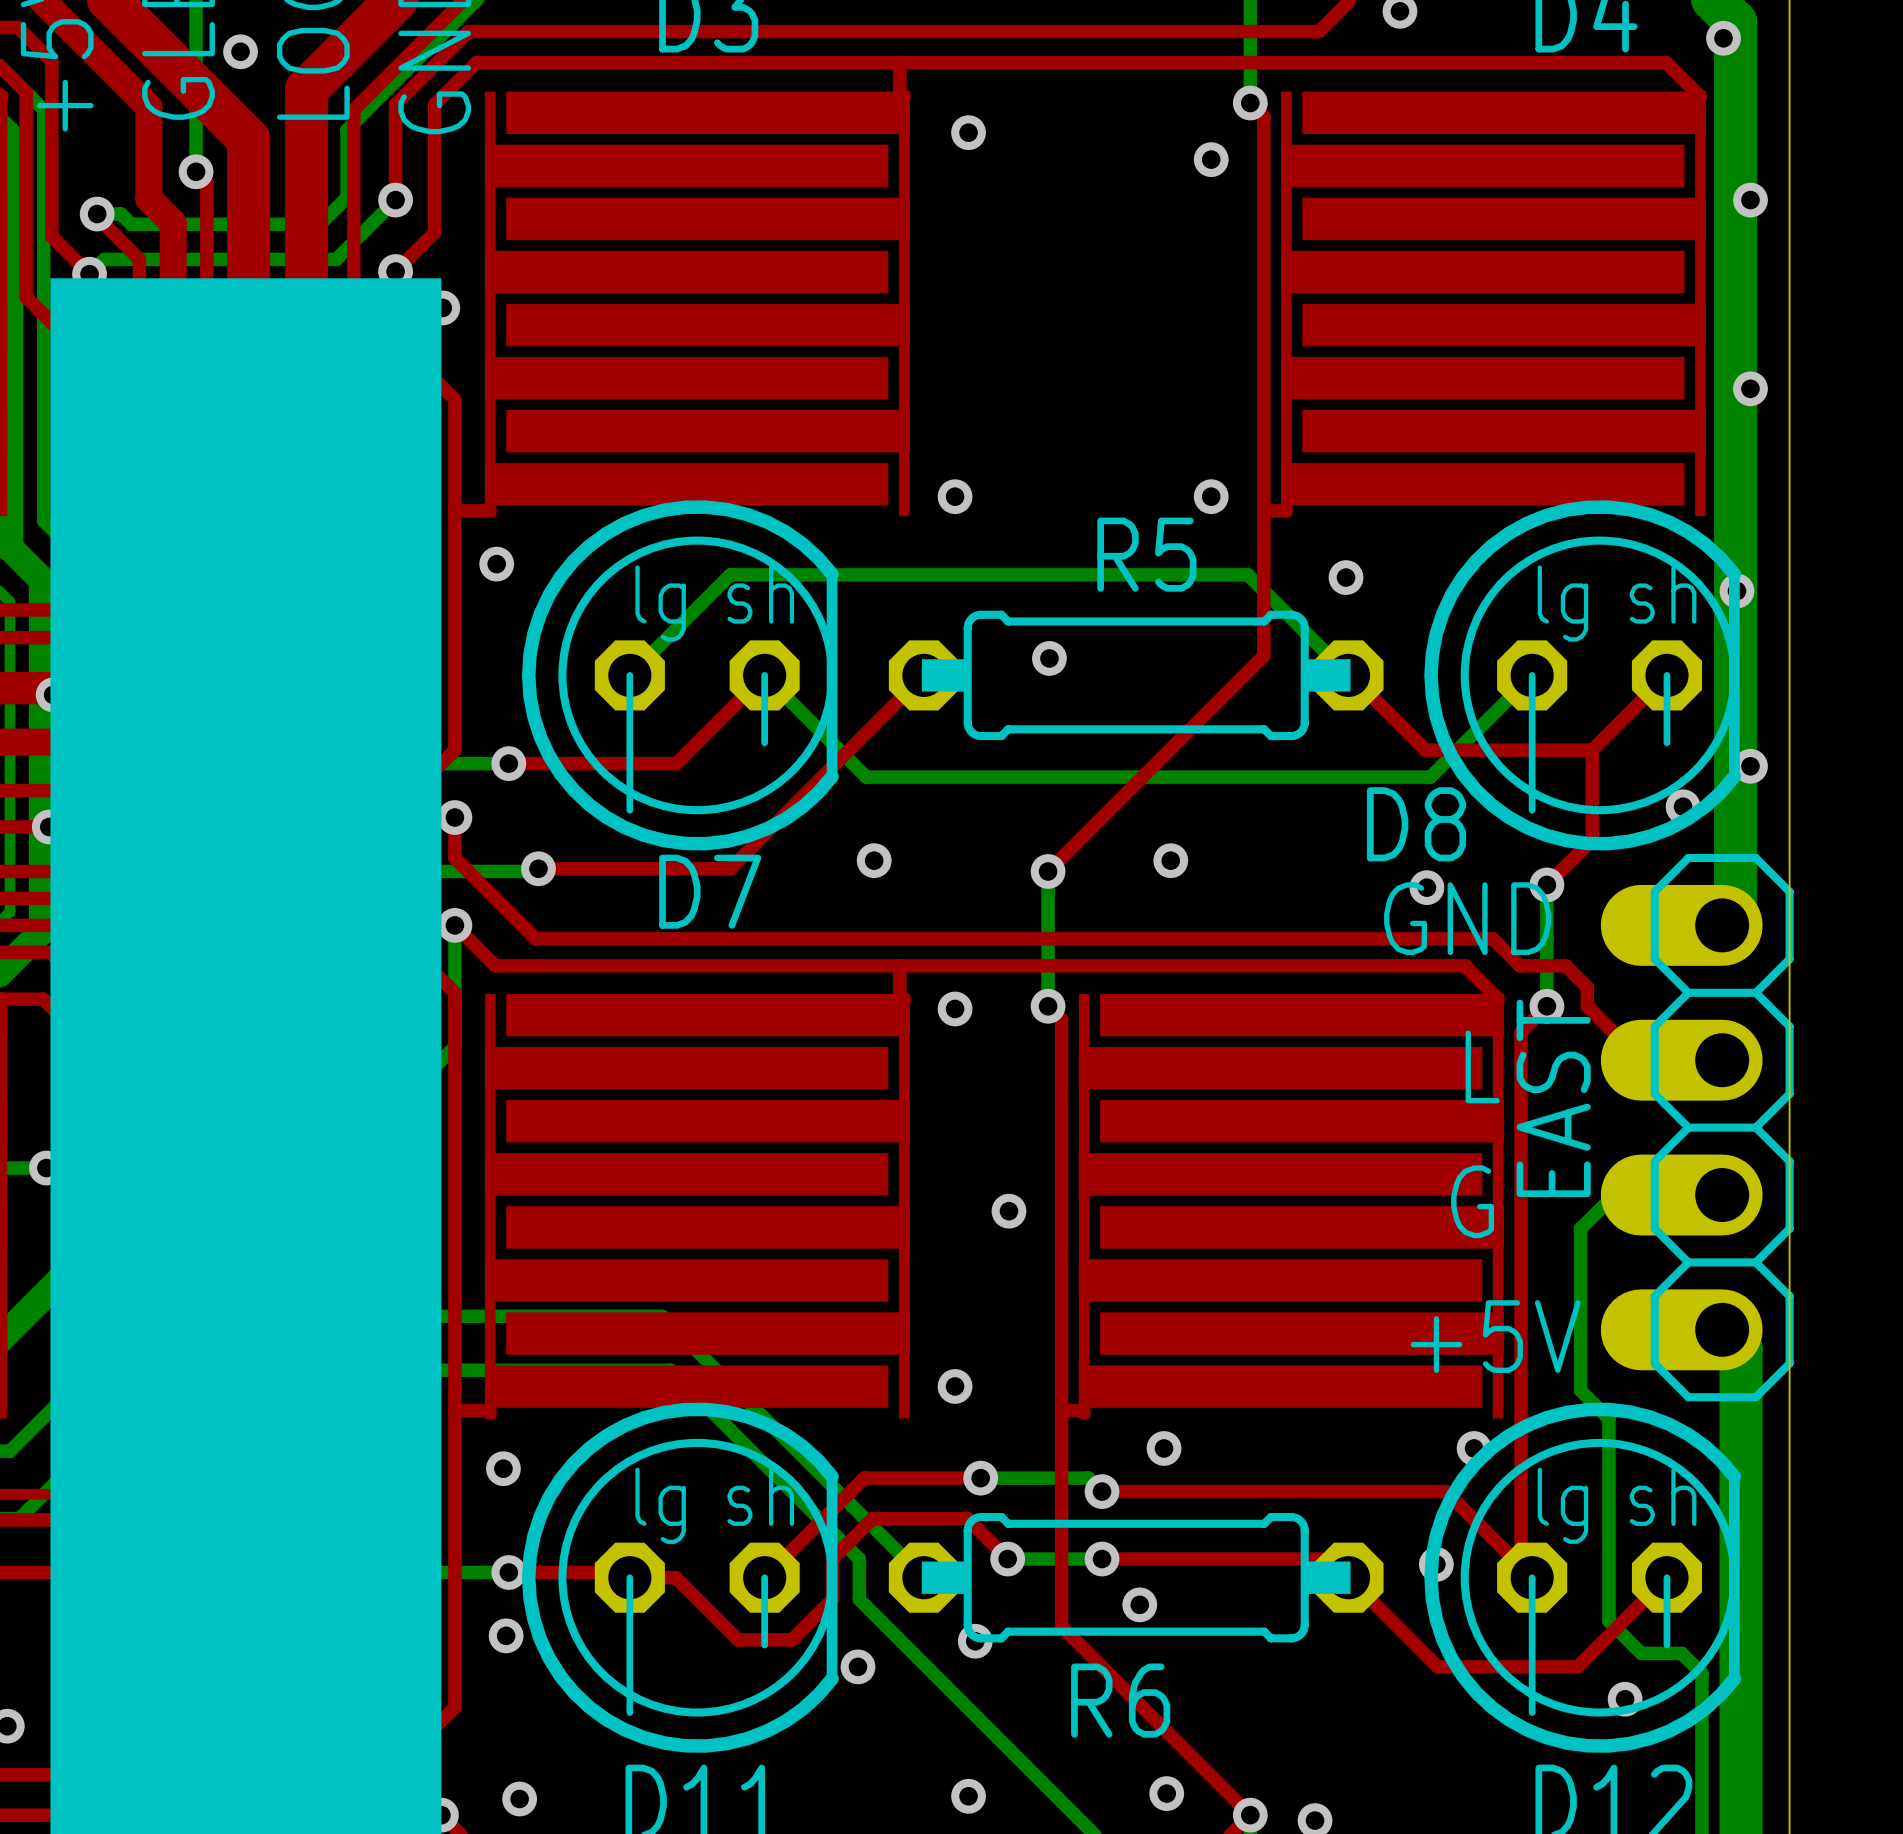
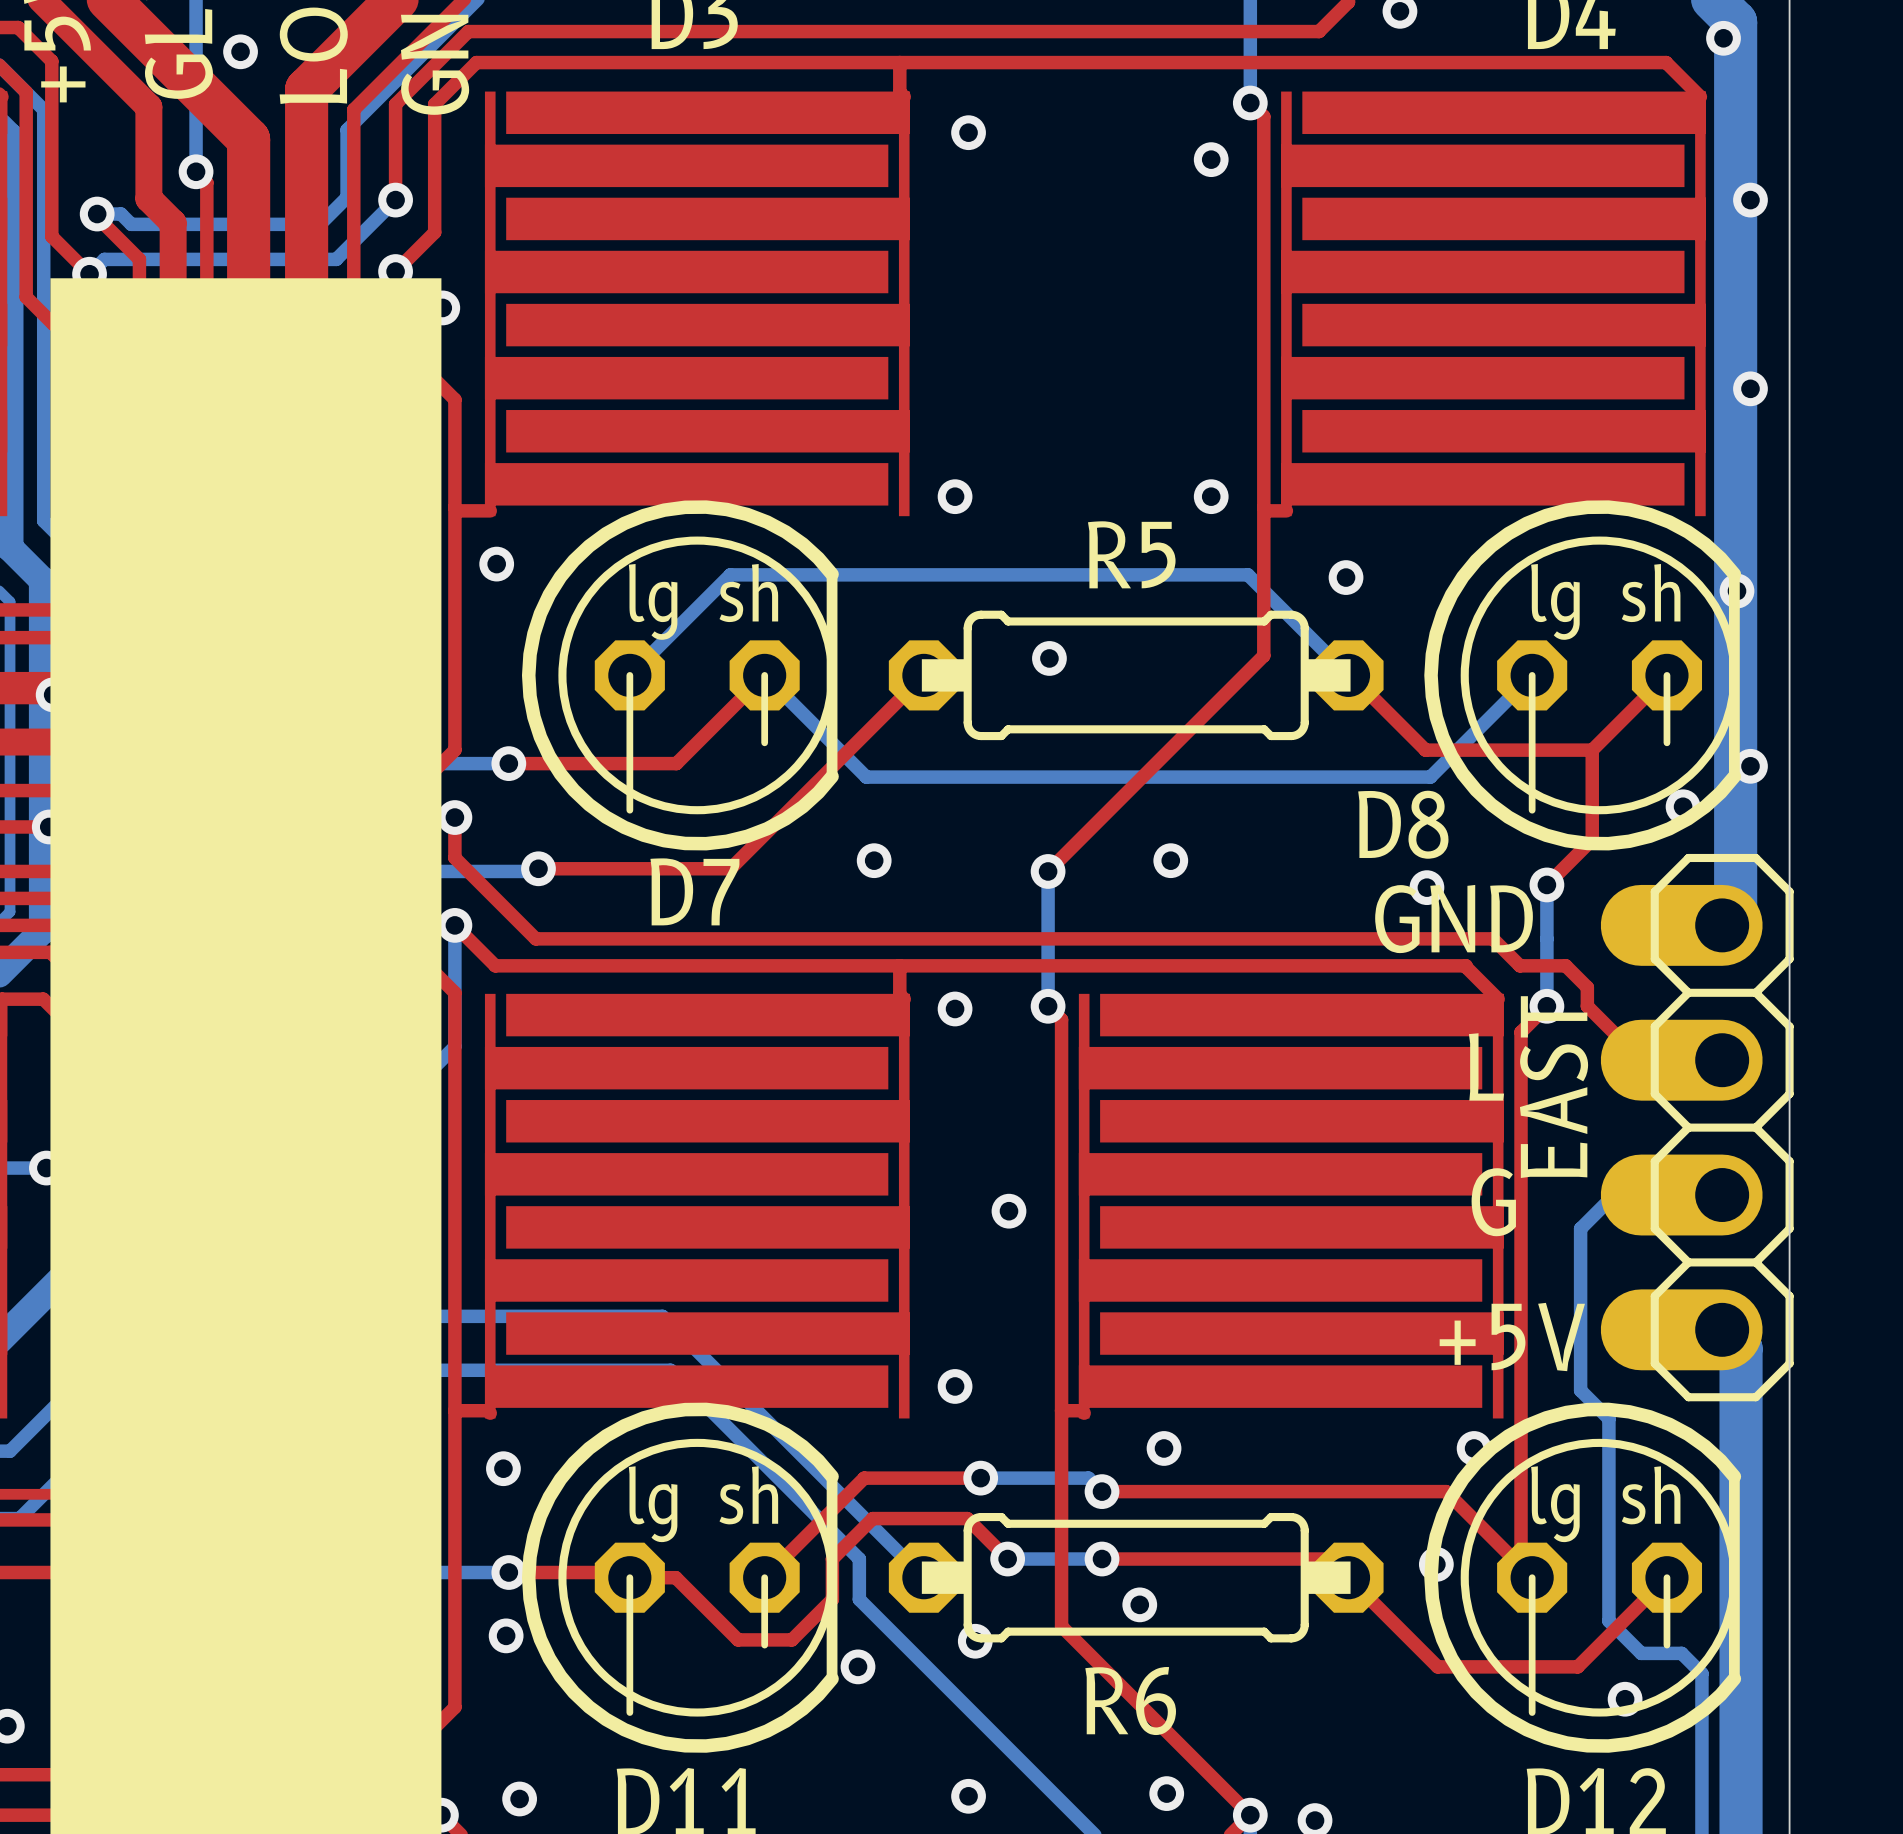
text position: G (1472, 1201) -> G (1493, 1202)

